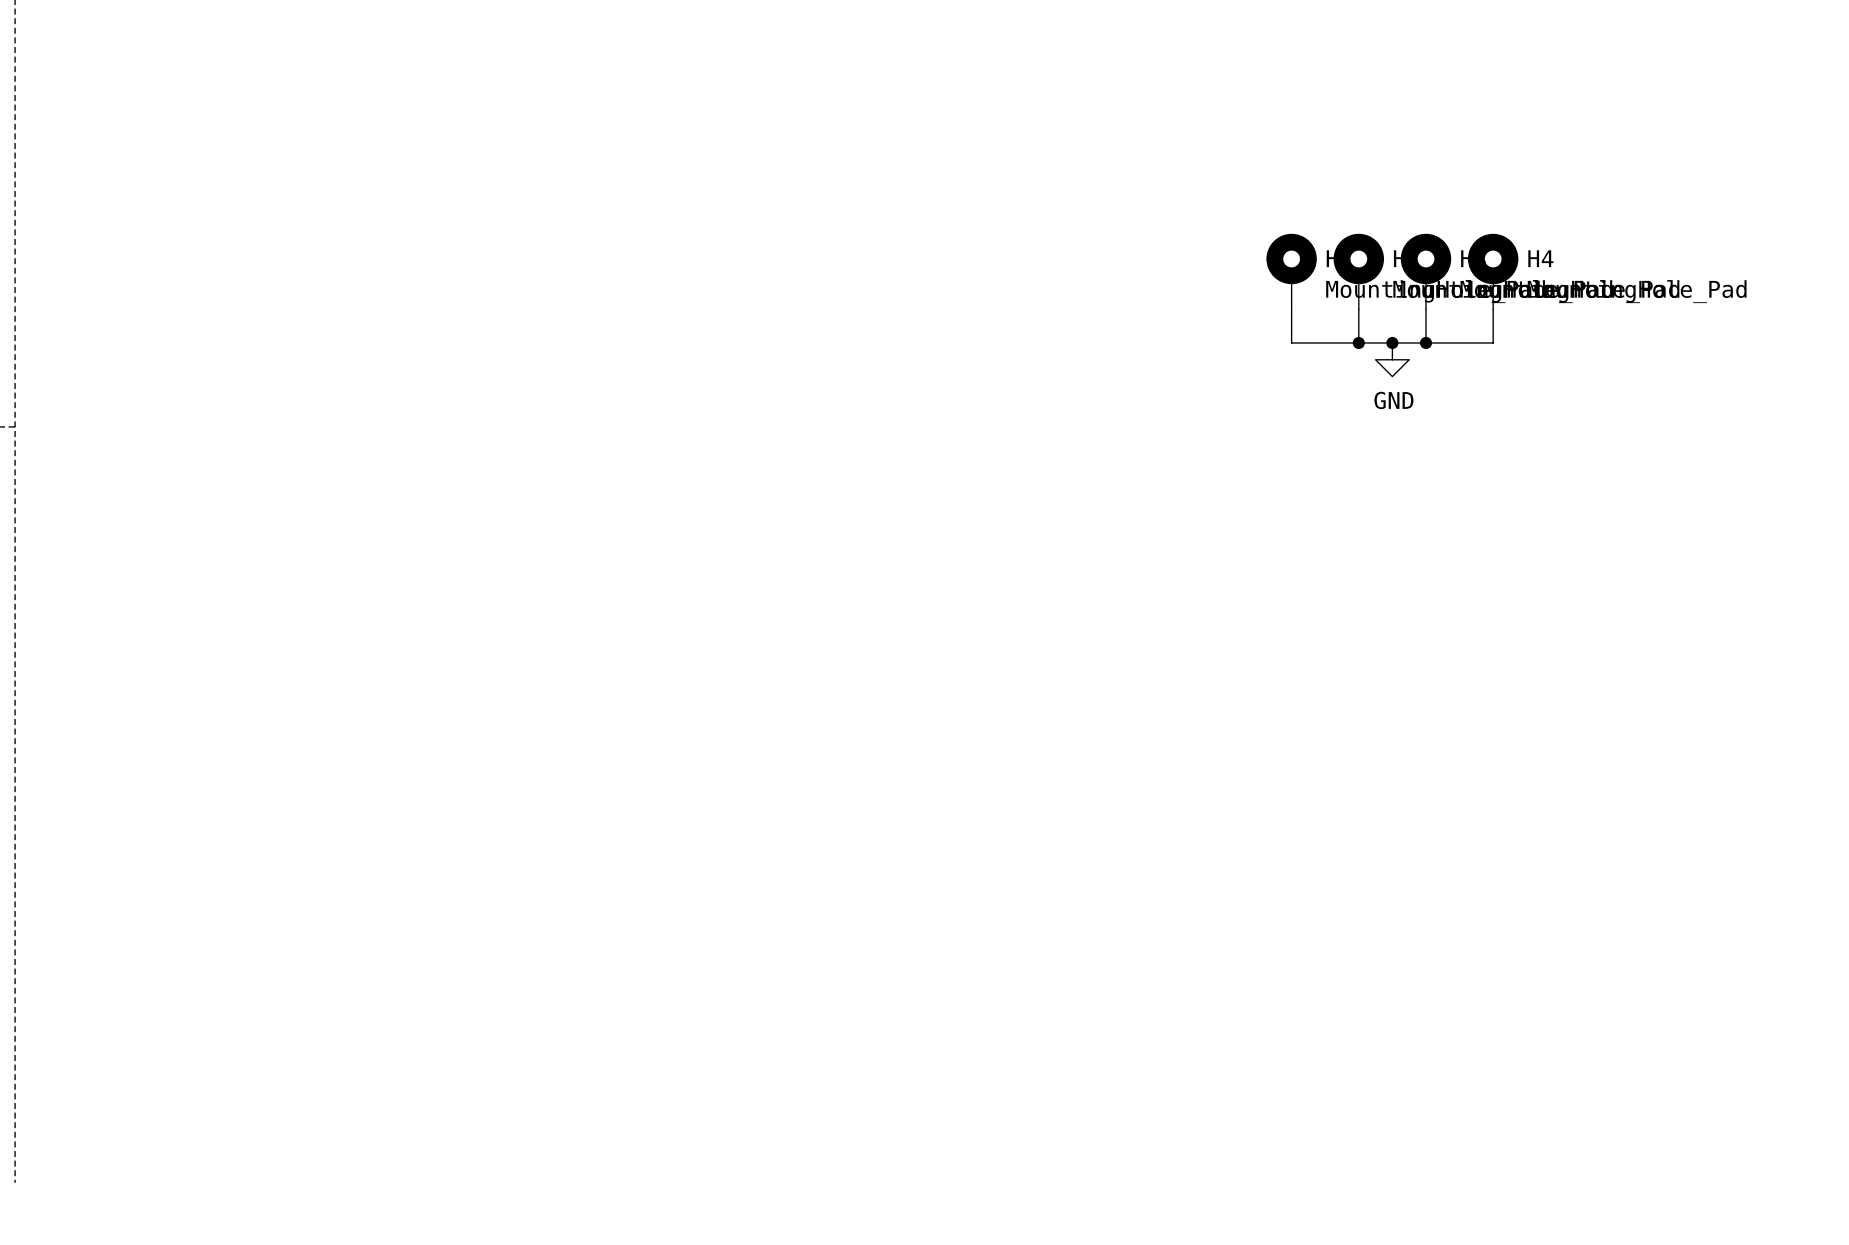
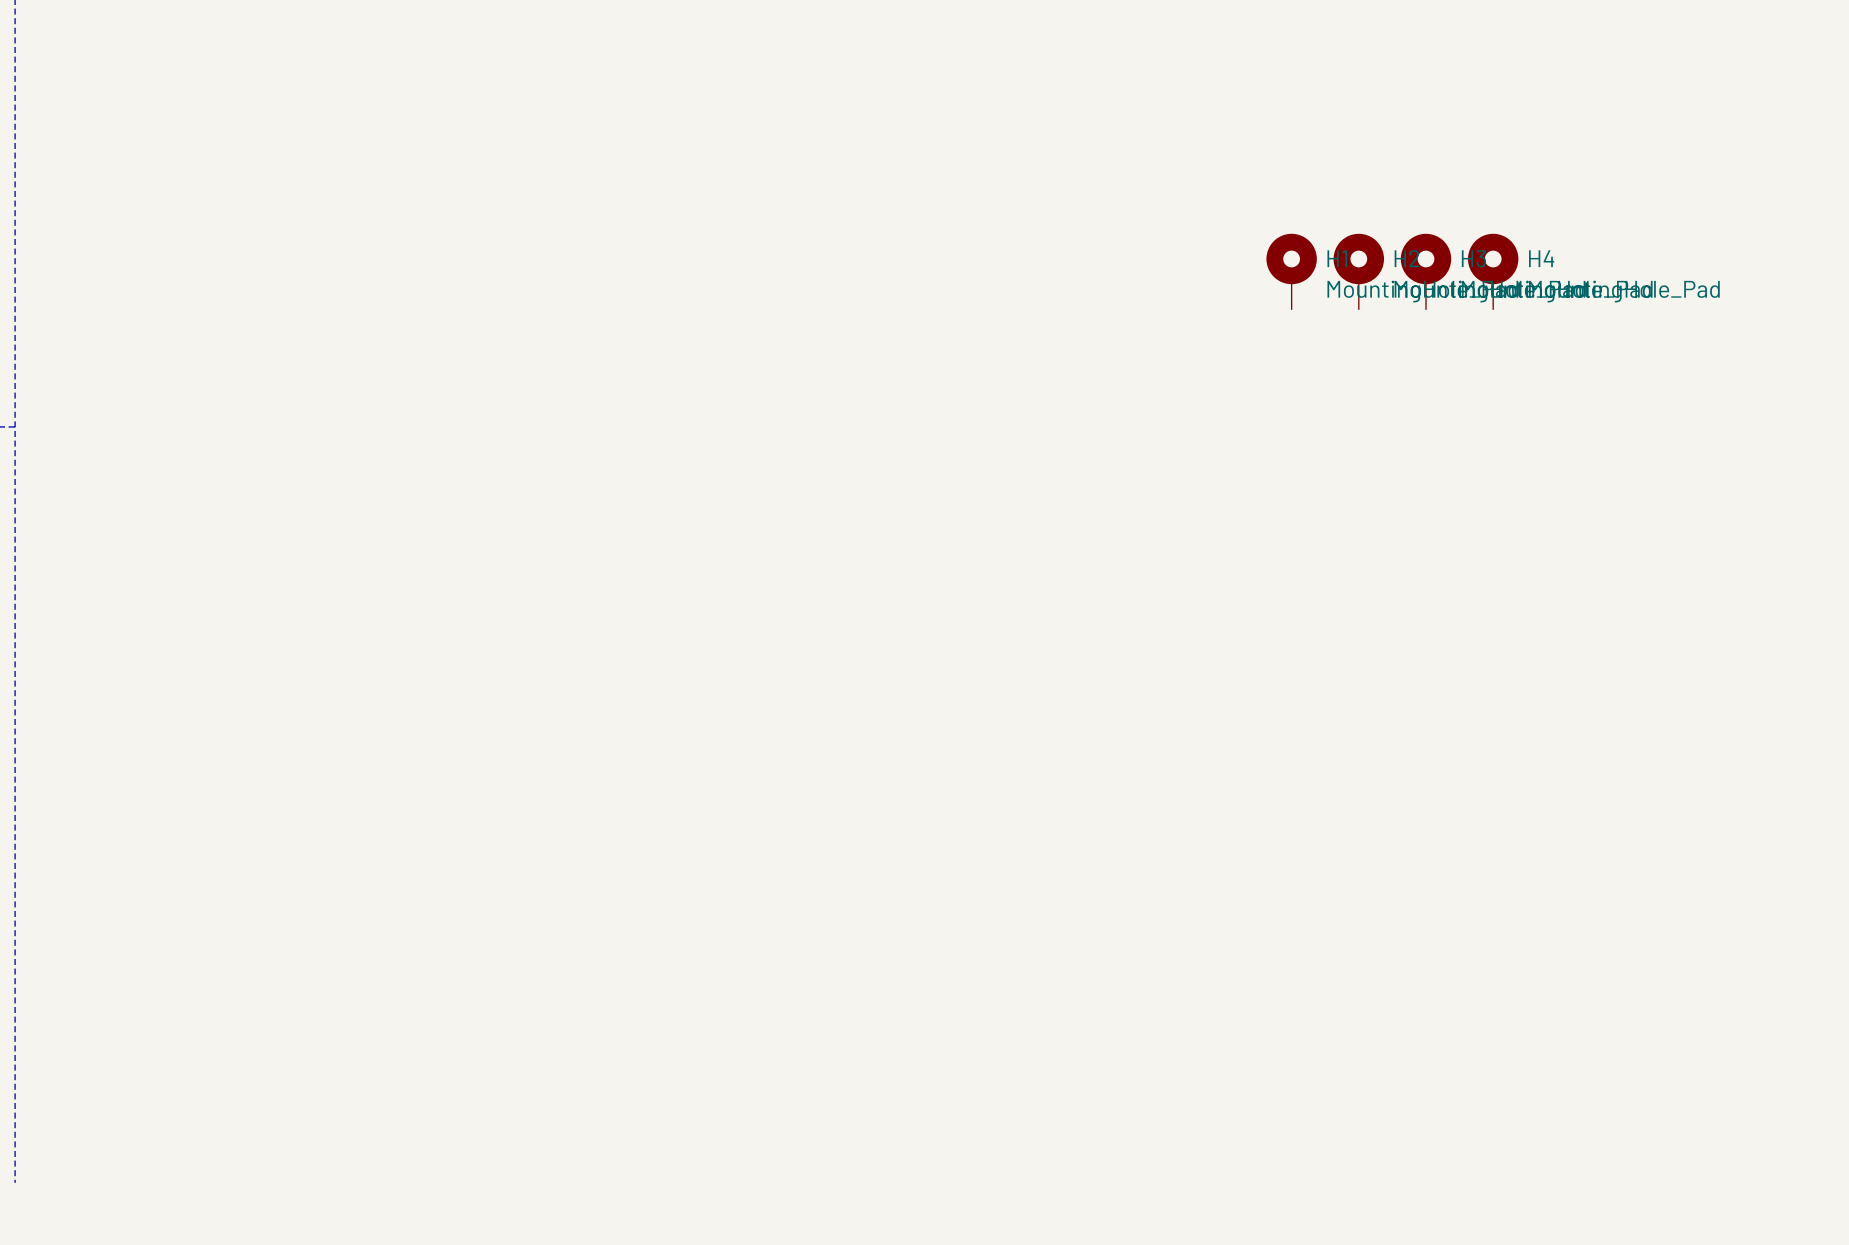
wire: (1291, 309) (1291, 342) (1493, 342) (1493, 309) -> none
wire: (1358, 309) (1358, 342) -> none
wire: (1426, 309) (1426, 342) -> none
junction: (1358, 342) -> none
junction: (1392, 342) -> none
junction: (1426, 342) -> none
power symbol: GND (1392, 359) -> none

